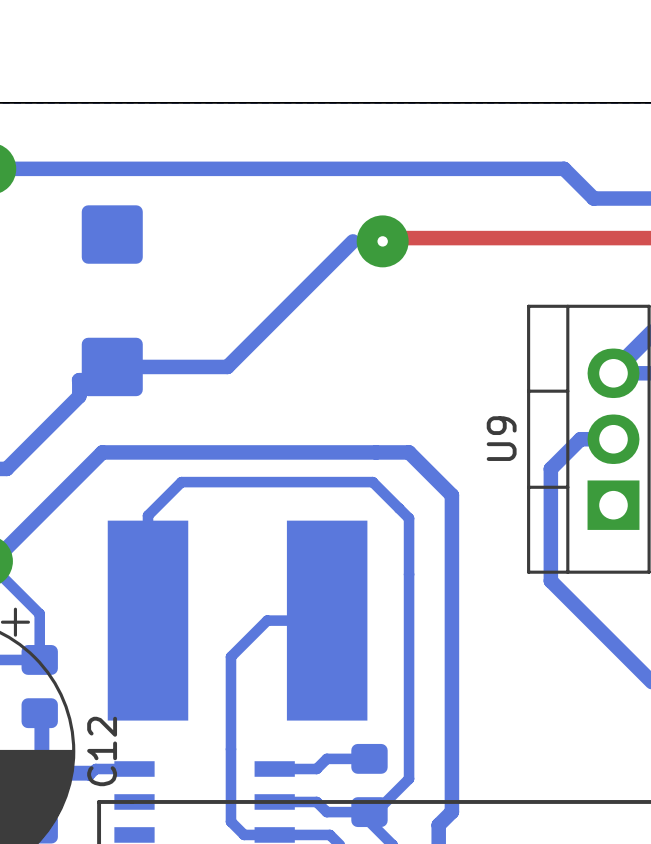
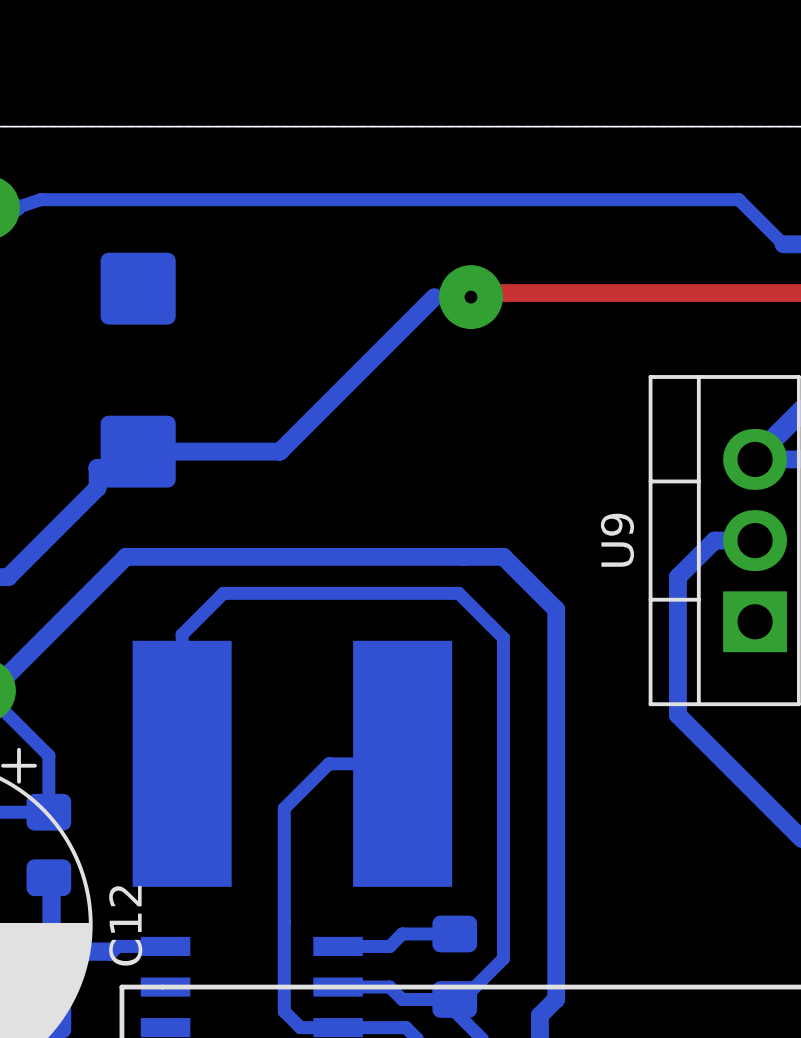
bottom track: (13, 168) (564, 168) (593, 198) (636, 198) -> (16, 207) (40, 199) (738, 199) (783, 244)

